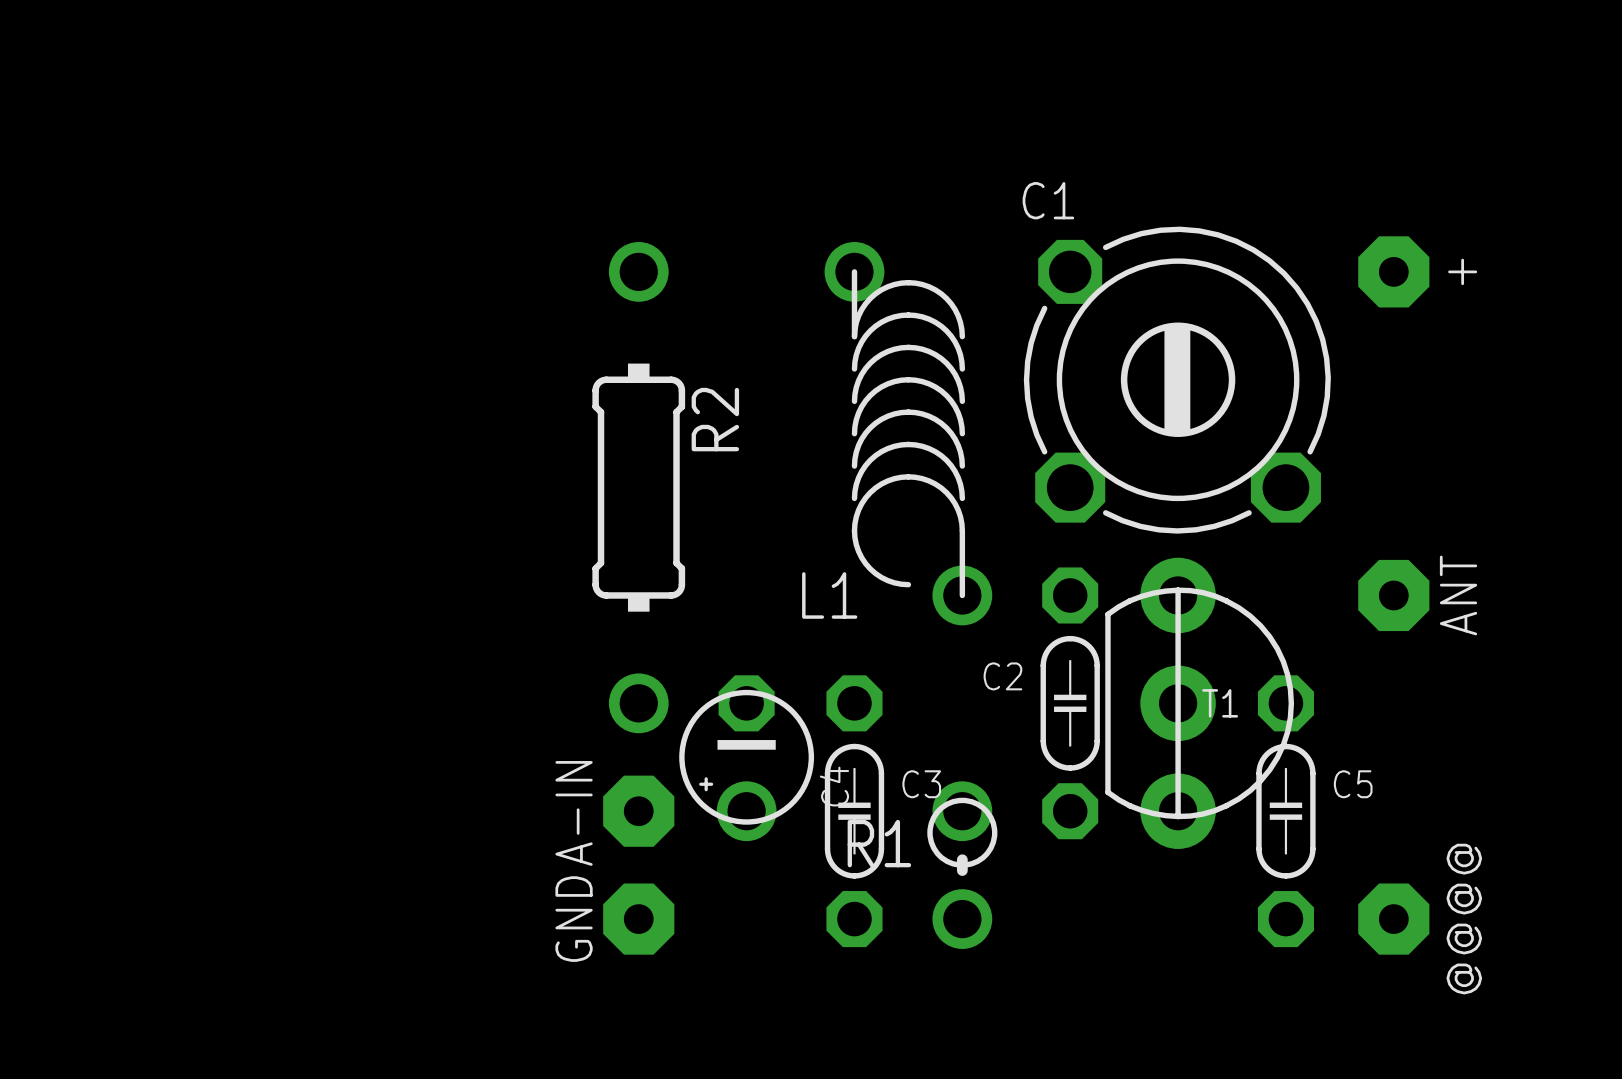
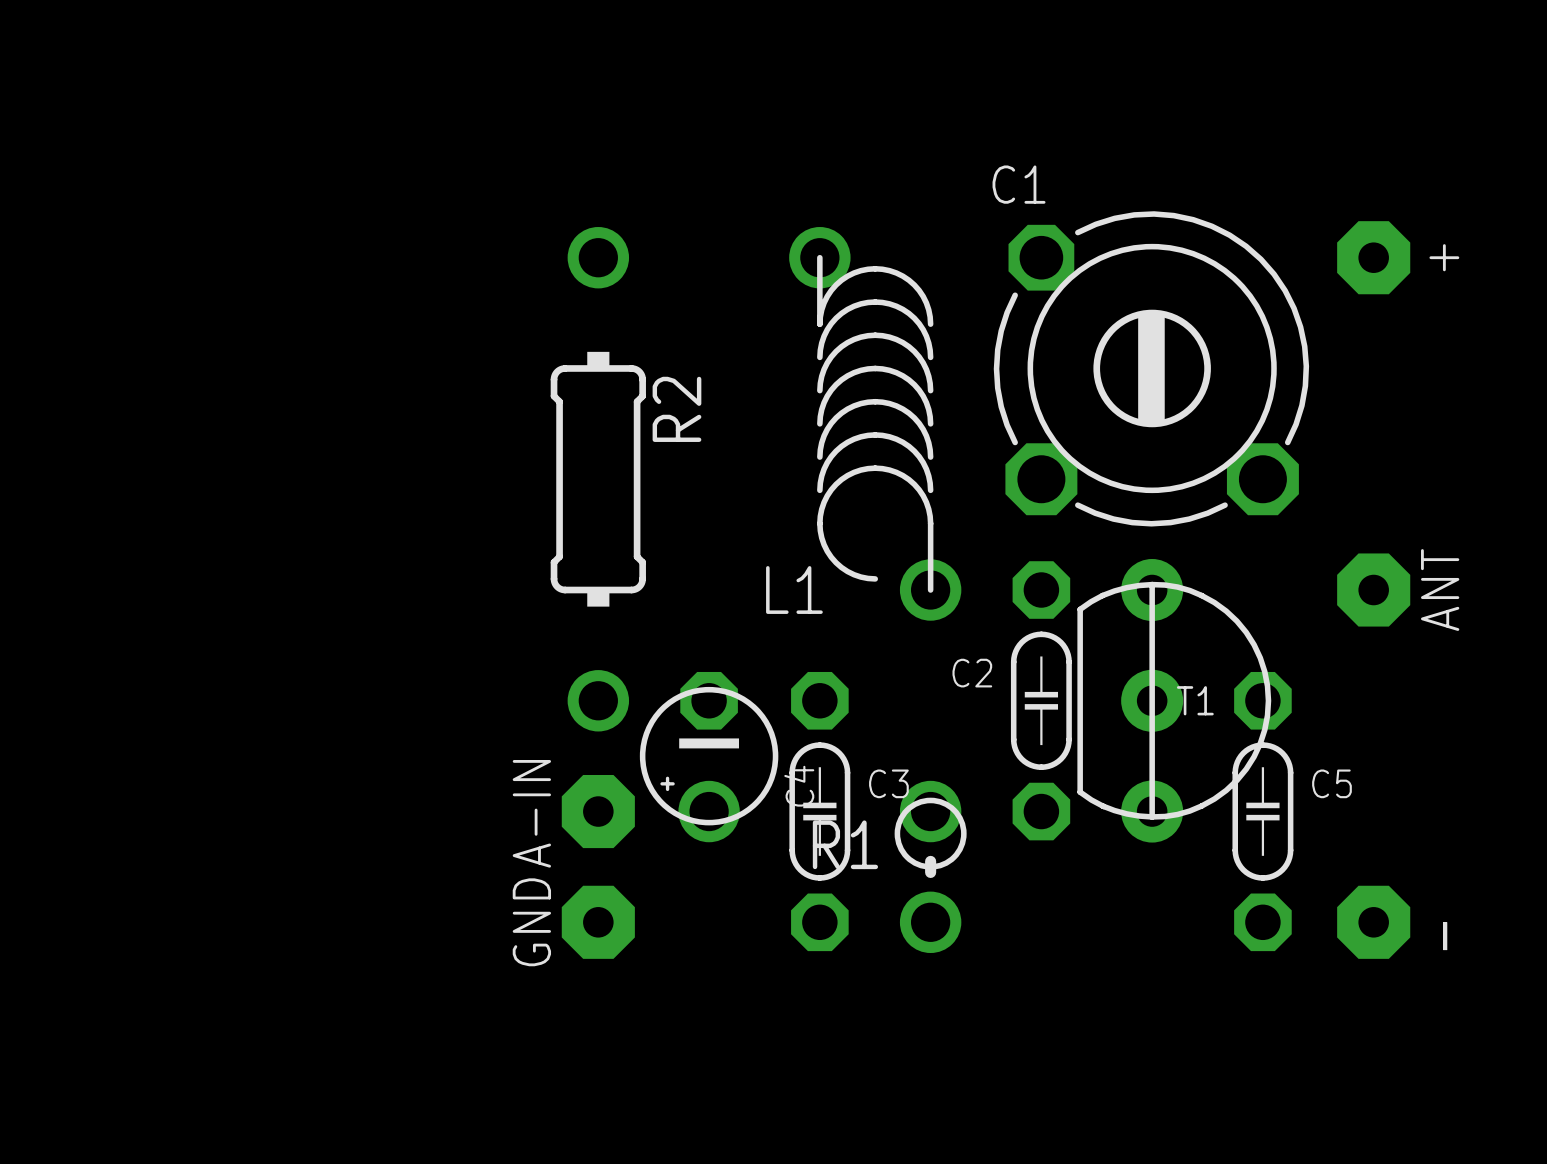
T1 footprint: [1105, 557, 1295, 849] -> [1077, 558, 1272, 843]
part name: @@@@ (1464, 919) -> ̶̶ (1445, 936)

